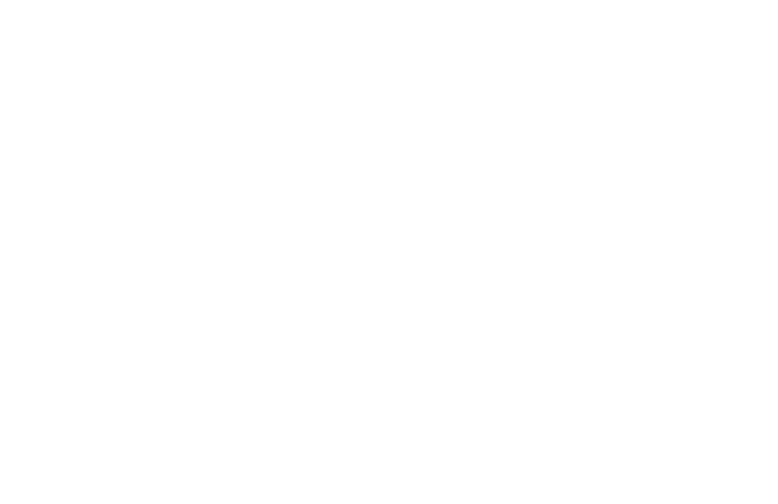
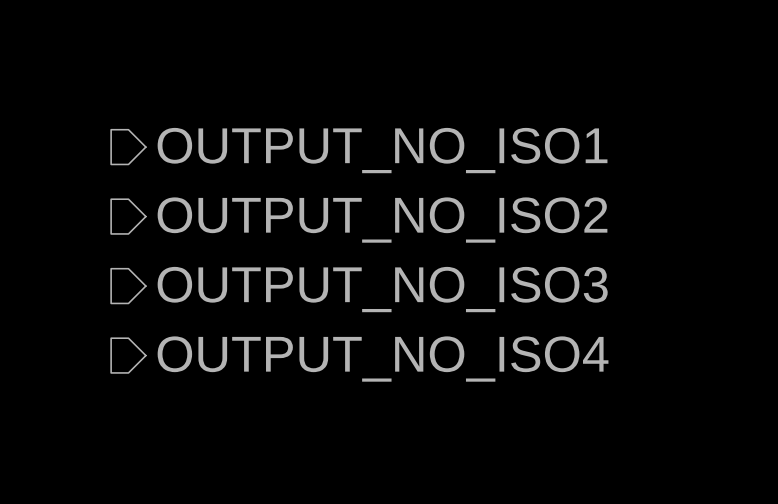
hierarchical label: none -> OUTPUT_NO_ISO1 (382, 150)
hierarchical label: none -> OUTPUT_NO_ISO2 (382, 220)
hierarchical label: none -> OUTPUT_NO_ISO3 (382, 289)
hierarchical label: none -> OUTPUT_NO_ISO4 (383, 359)

